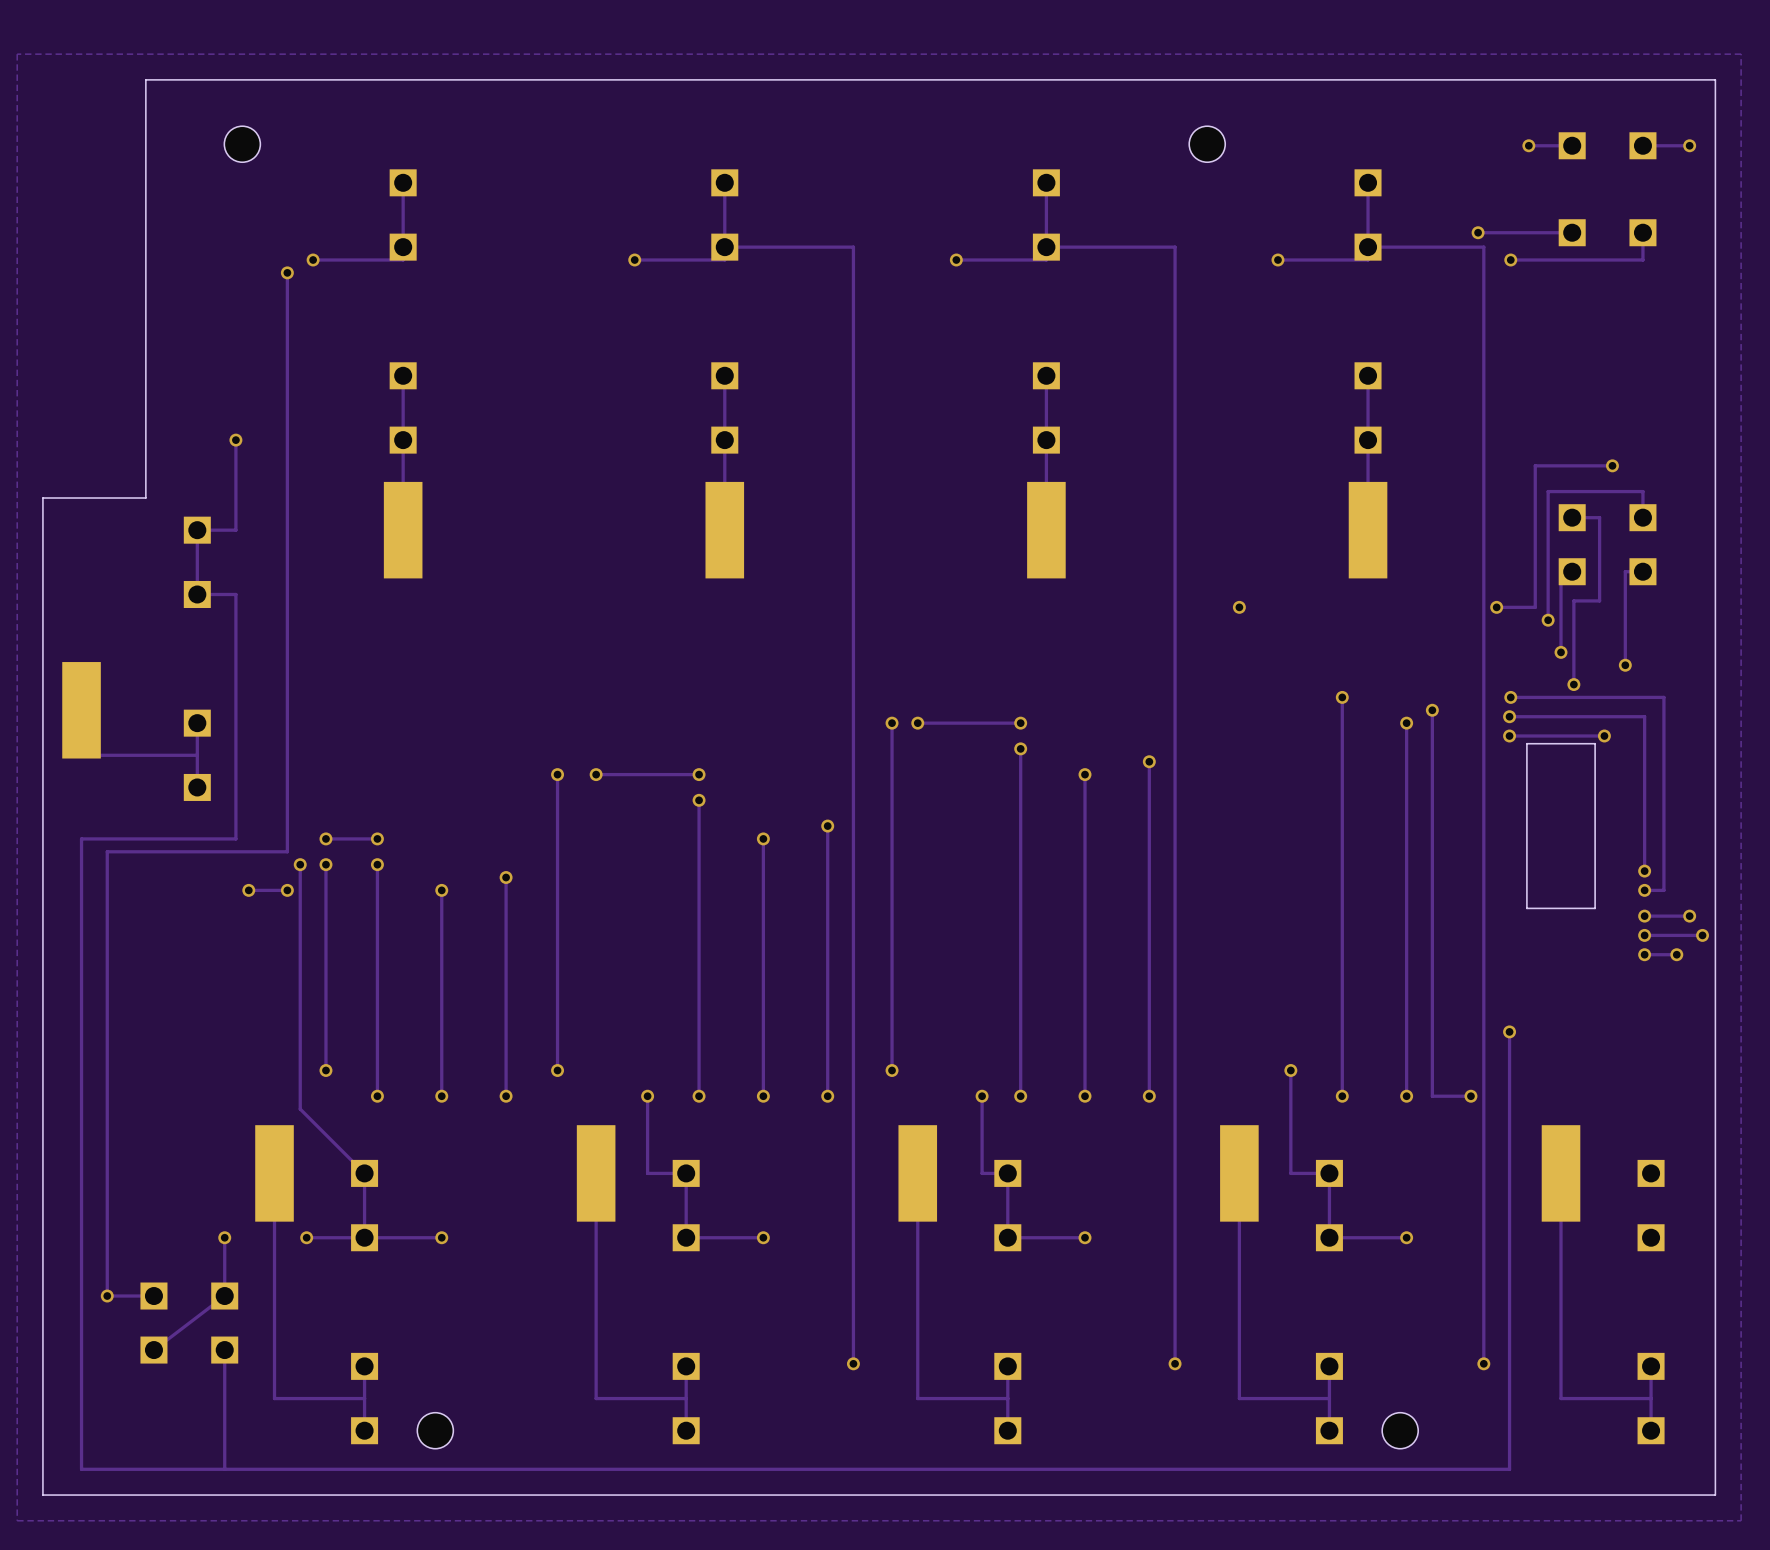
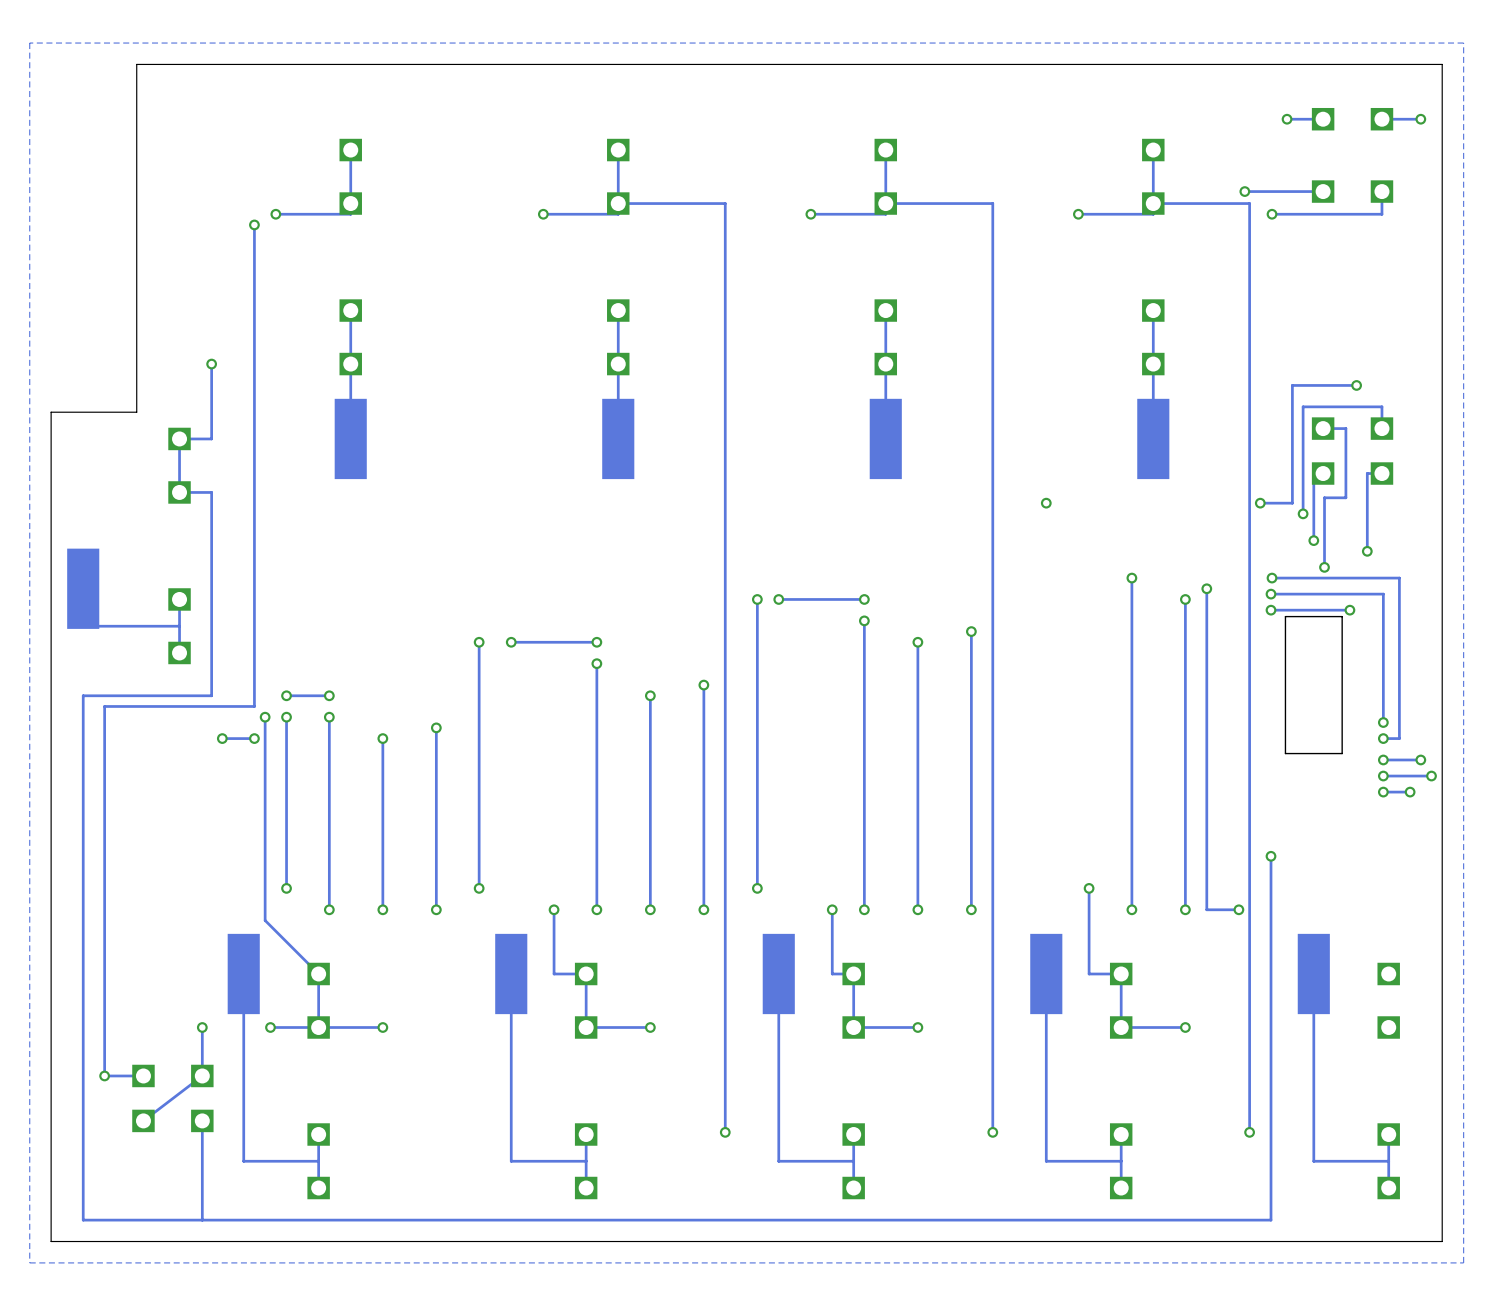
hole: (242, 144) -> none
hole: (1207, 144) -> none
hole: (435, 1430) -> none
hole: (1400, 1430) -> none

